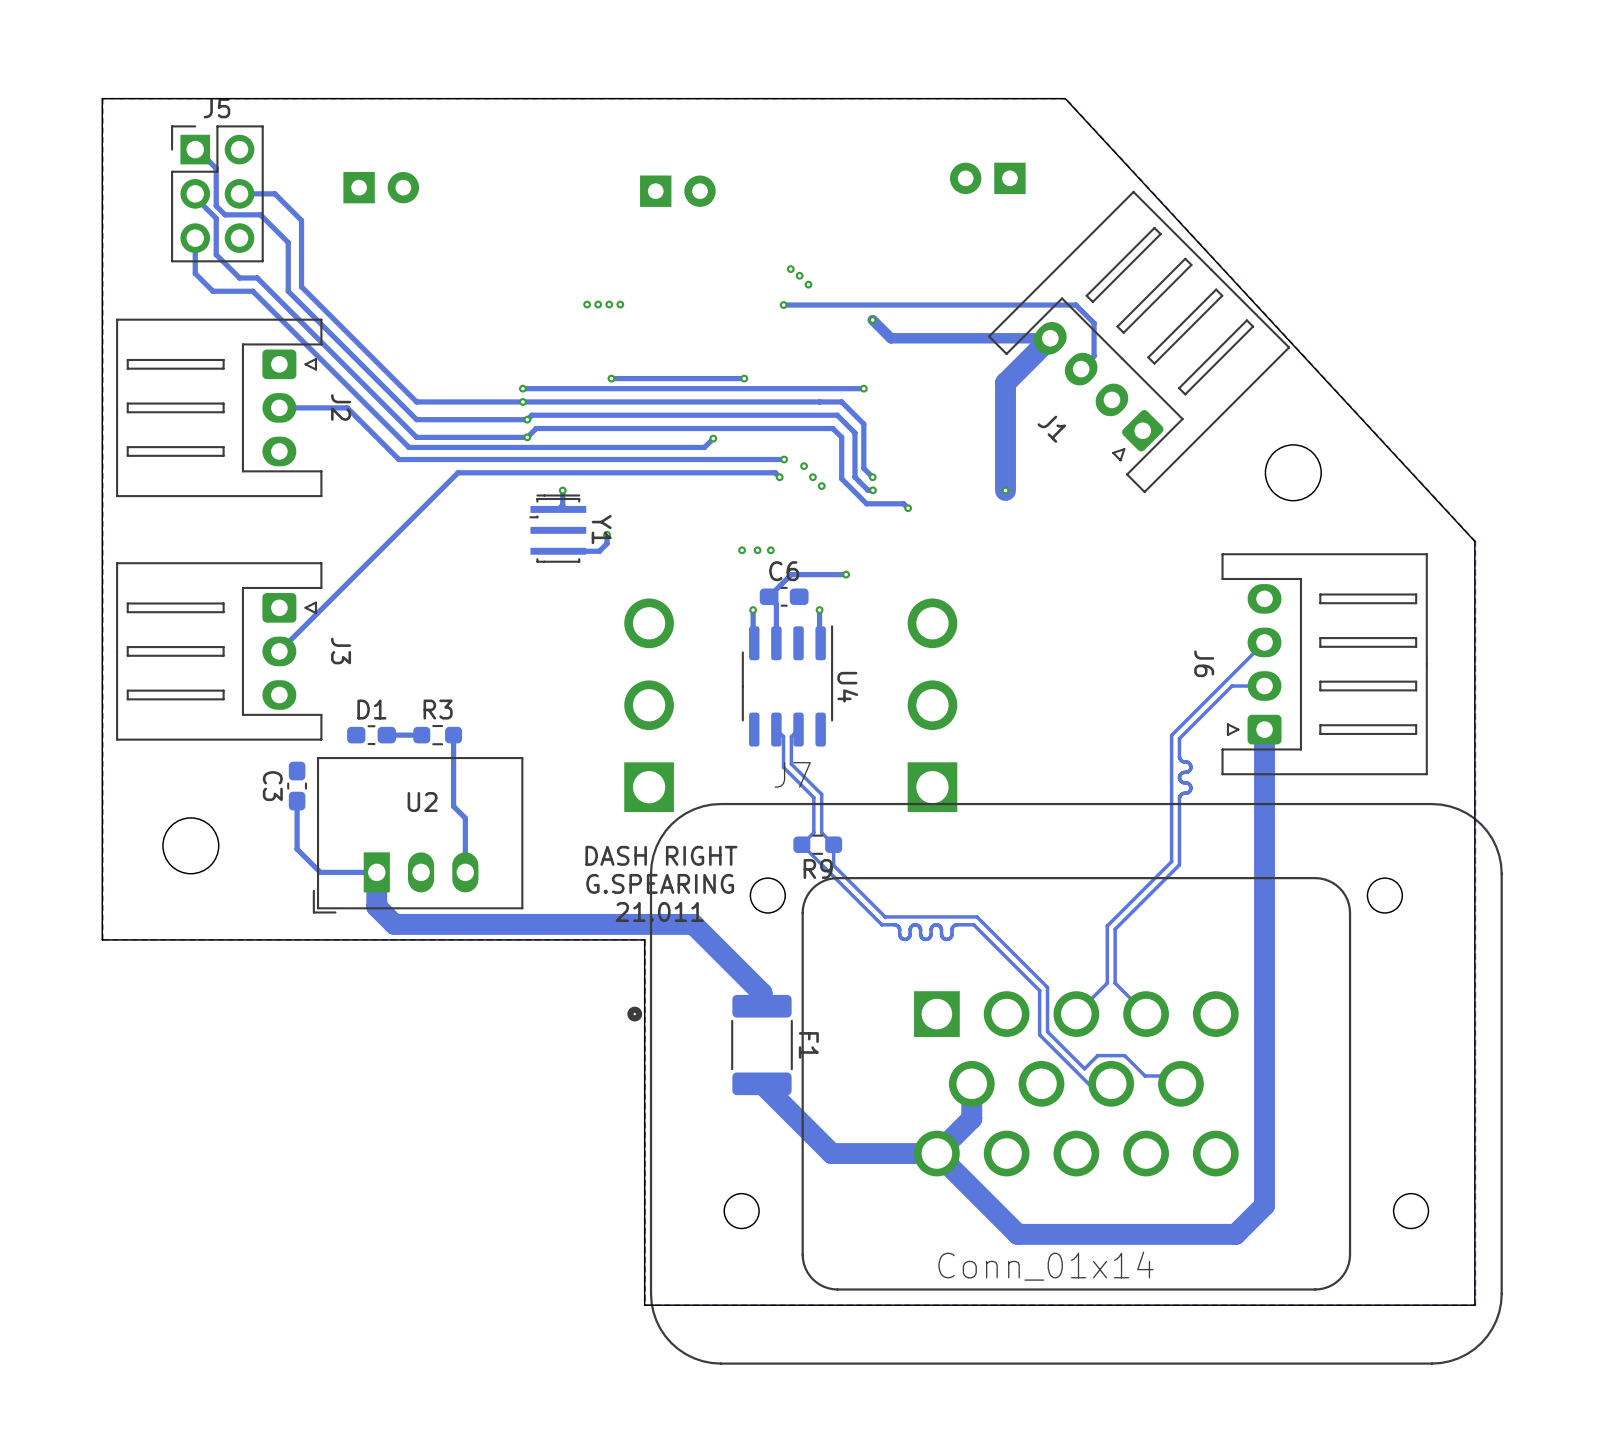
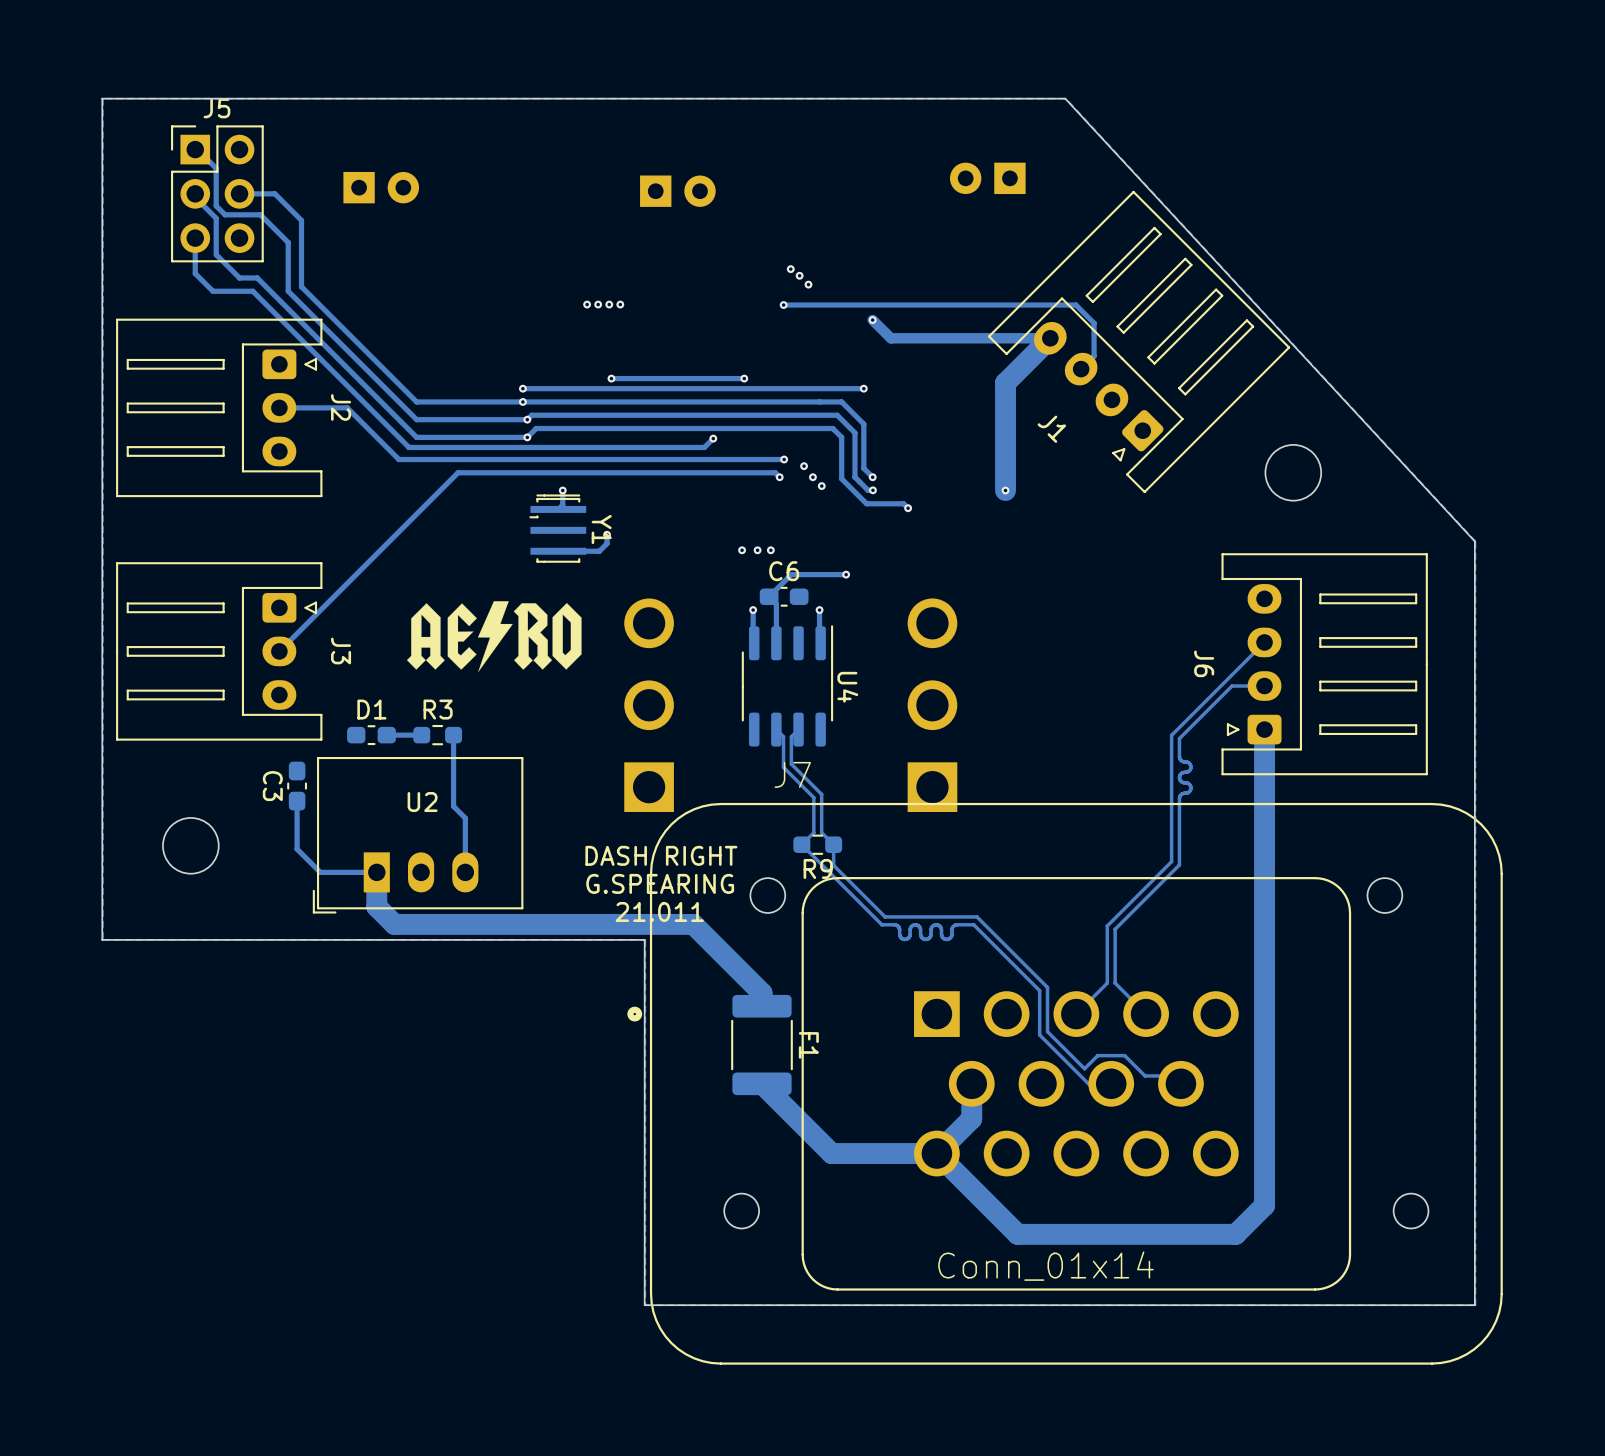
drawing: none -> [406, 601, 582, 672]

